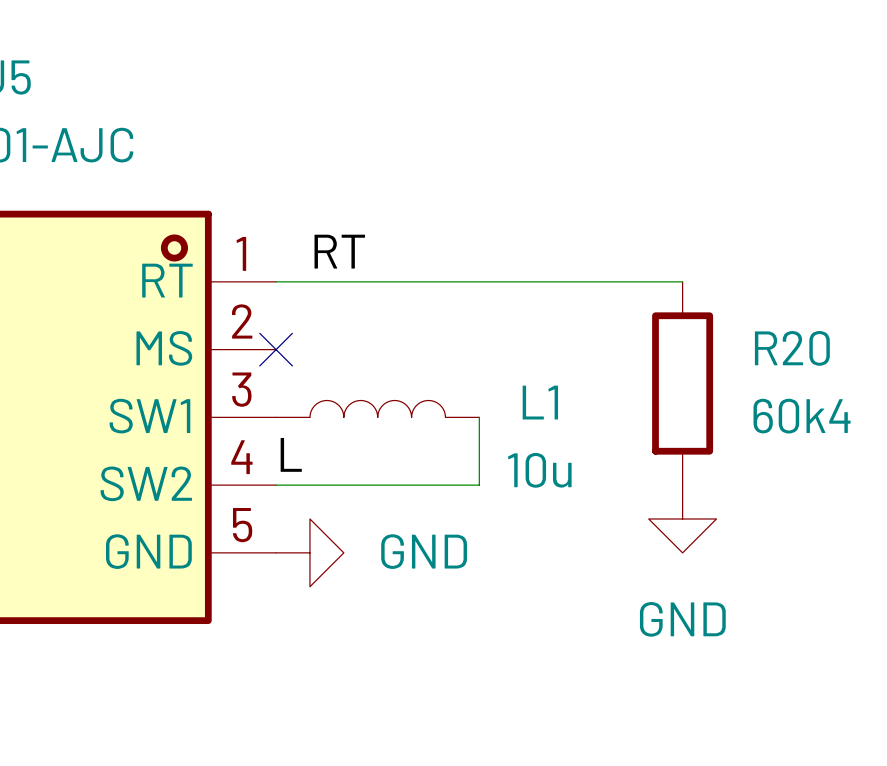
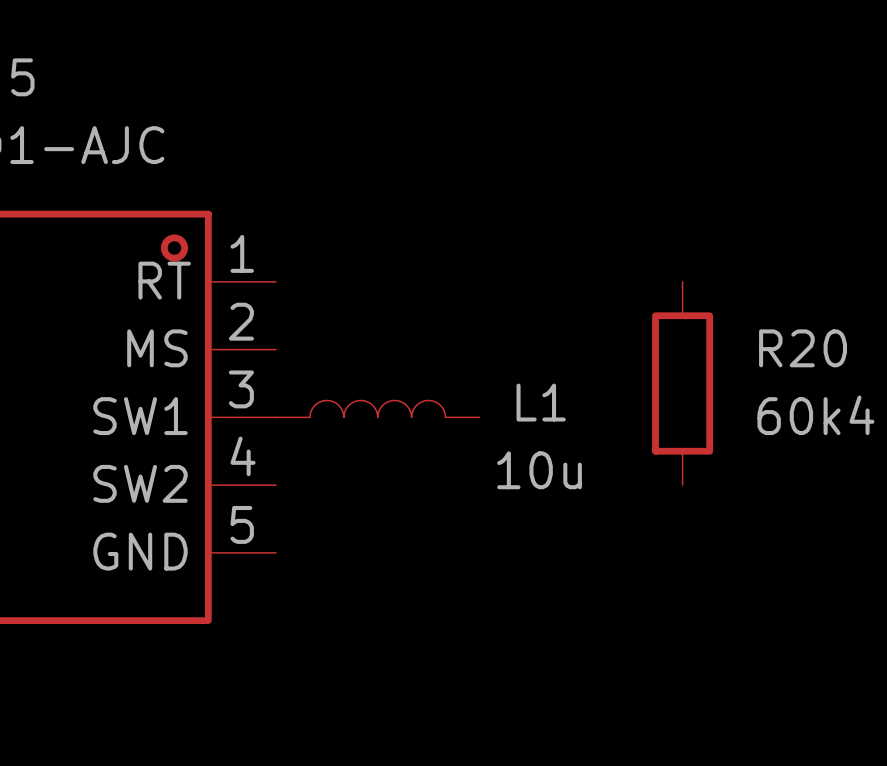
label: RT (339, 251) -> none
wire: (276, 281) (682, 281) -> none
no-connect mark: (276, 349) -> none
wire: (479, 417) (479, 485) (276, 485) -> none
label: L (291, 454) -> none
power symbol: GND (682, 518) -> none
power symbol: GND (309, 552) -> none

